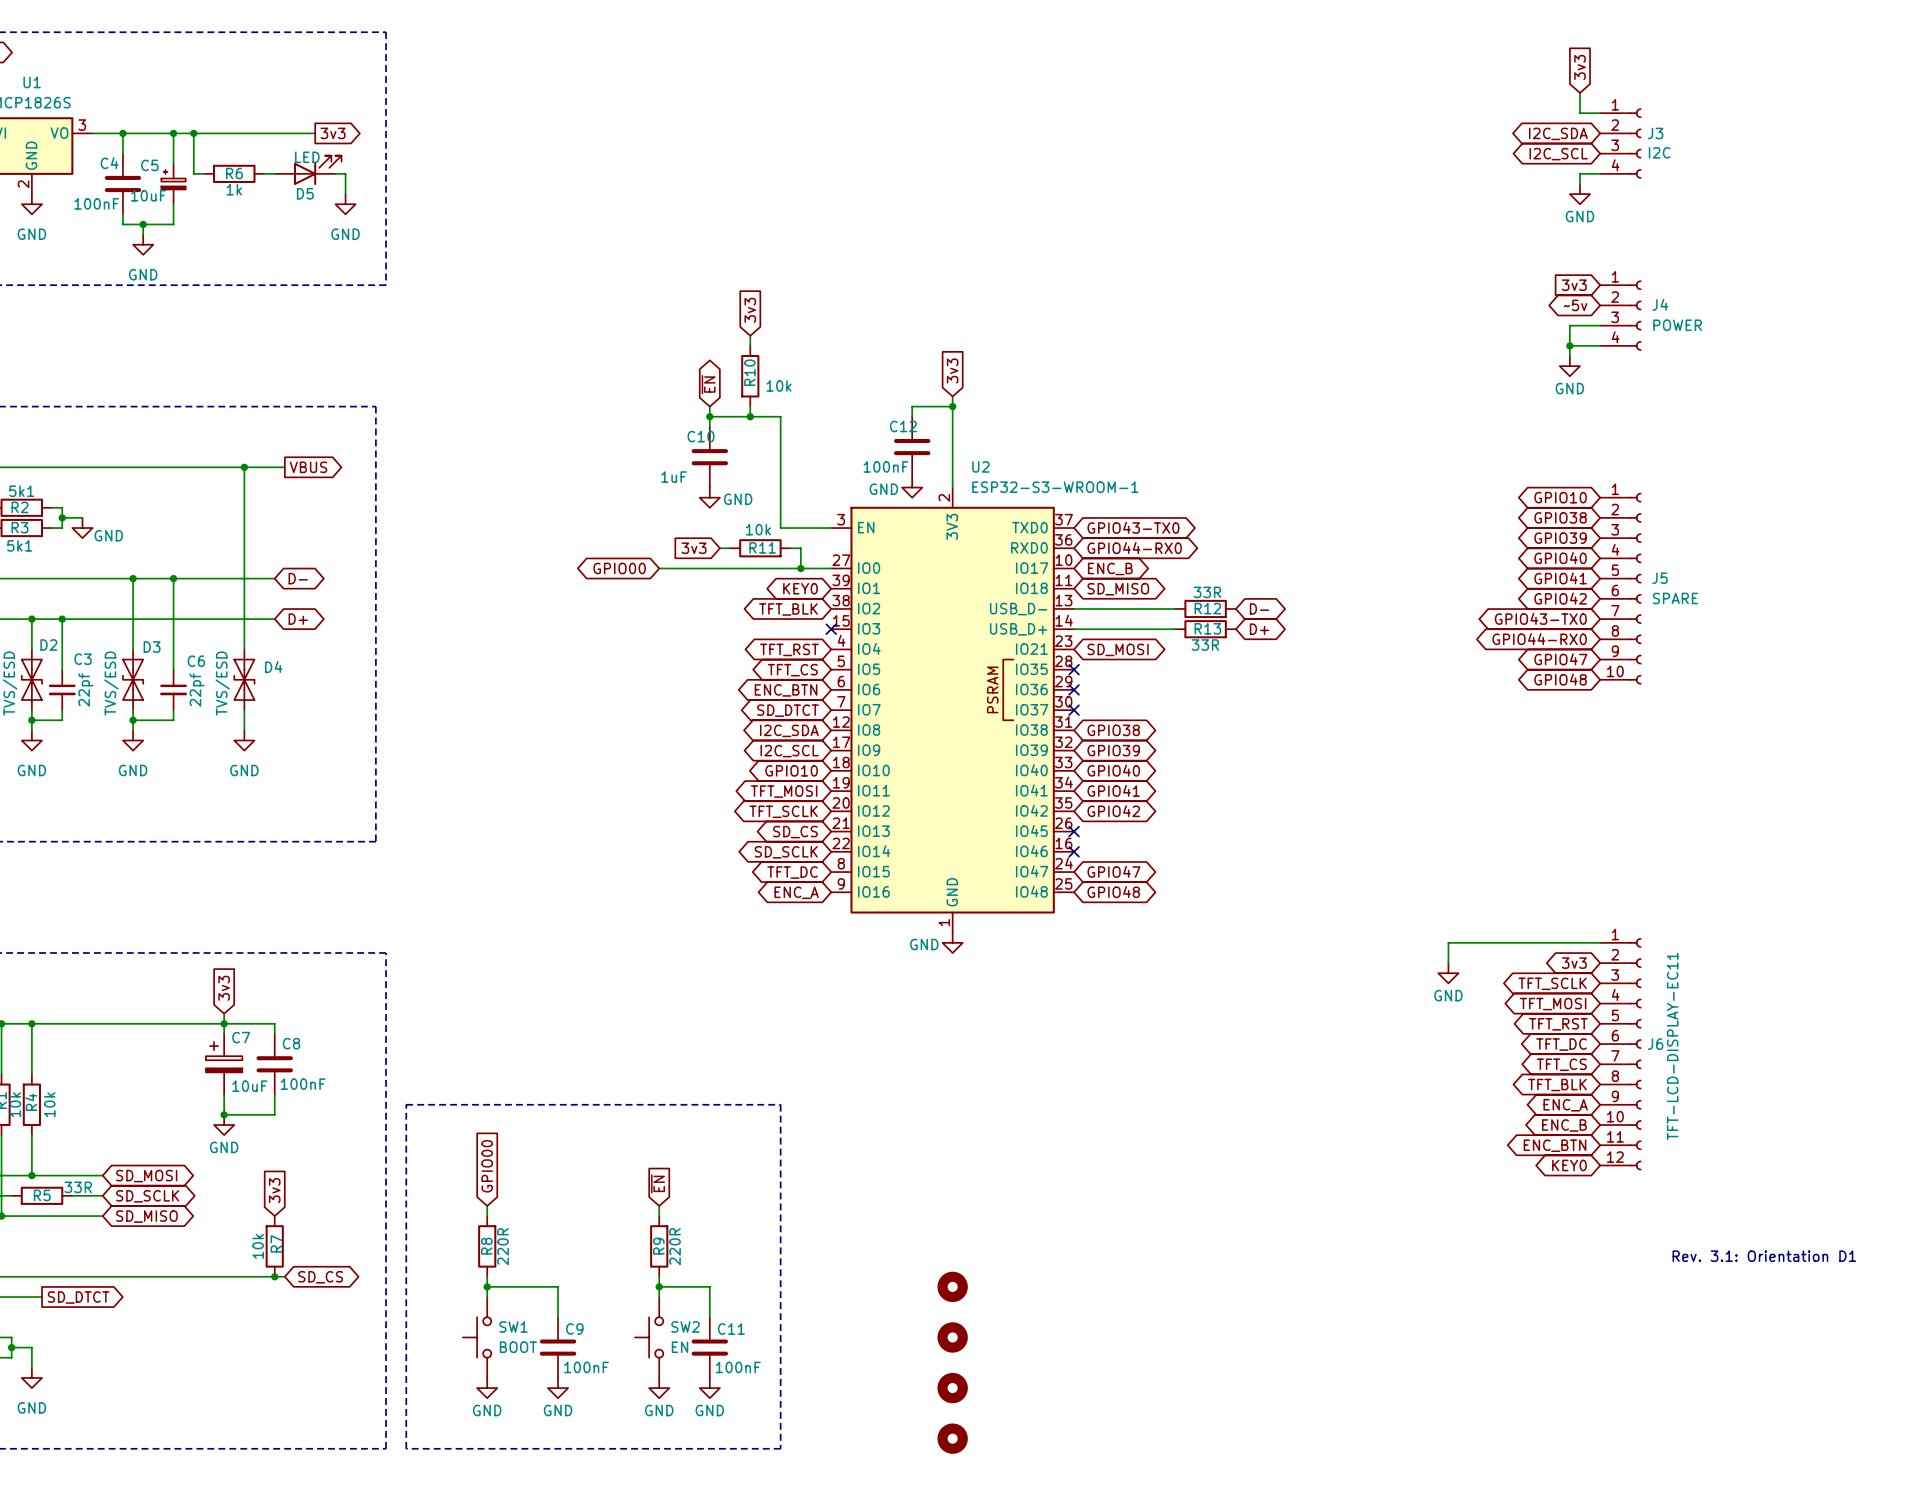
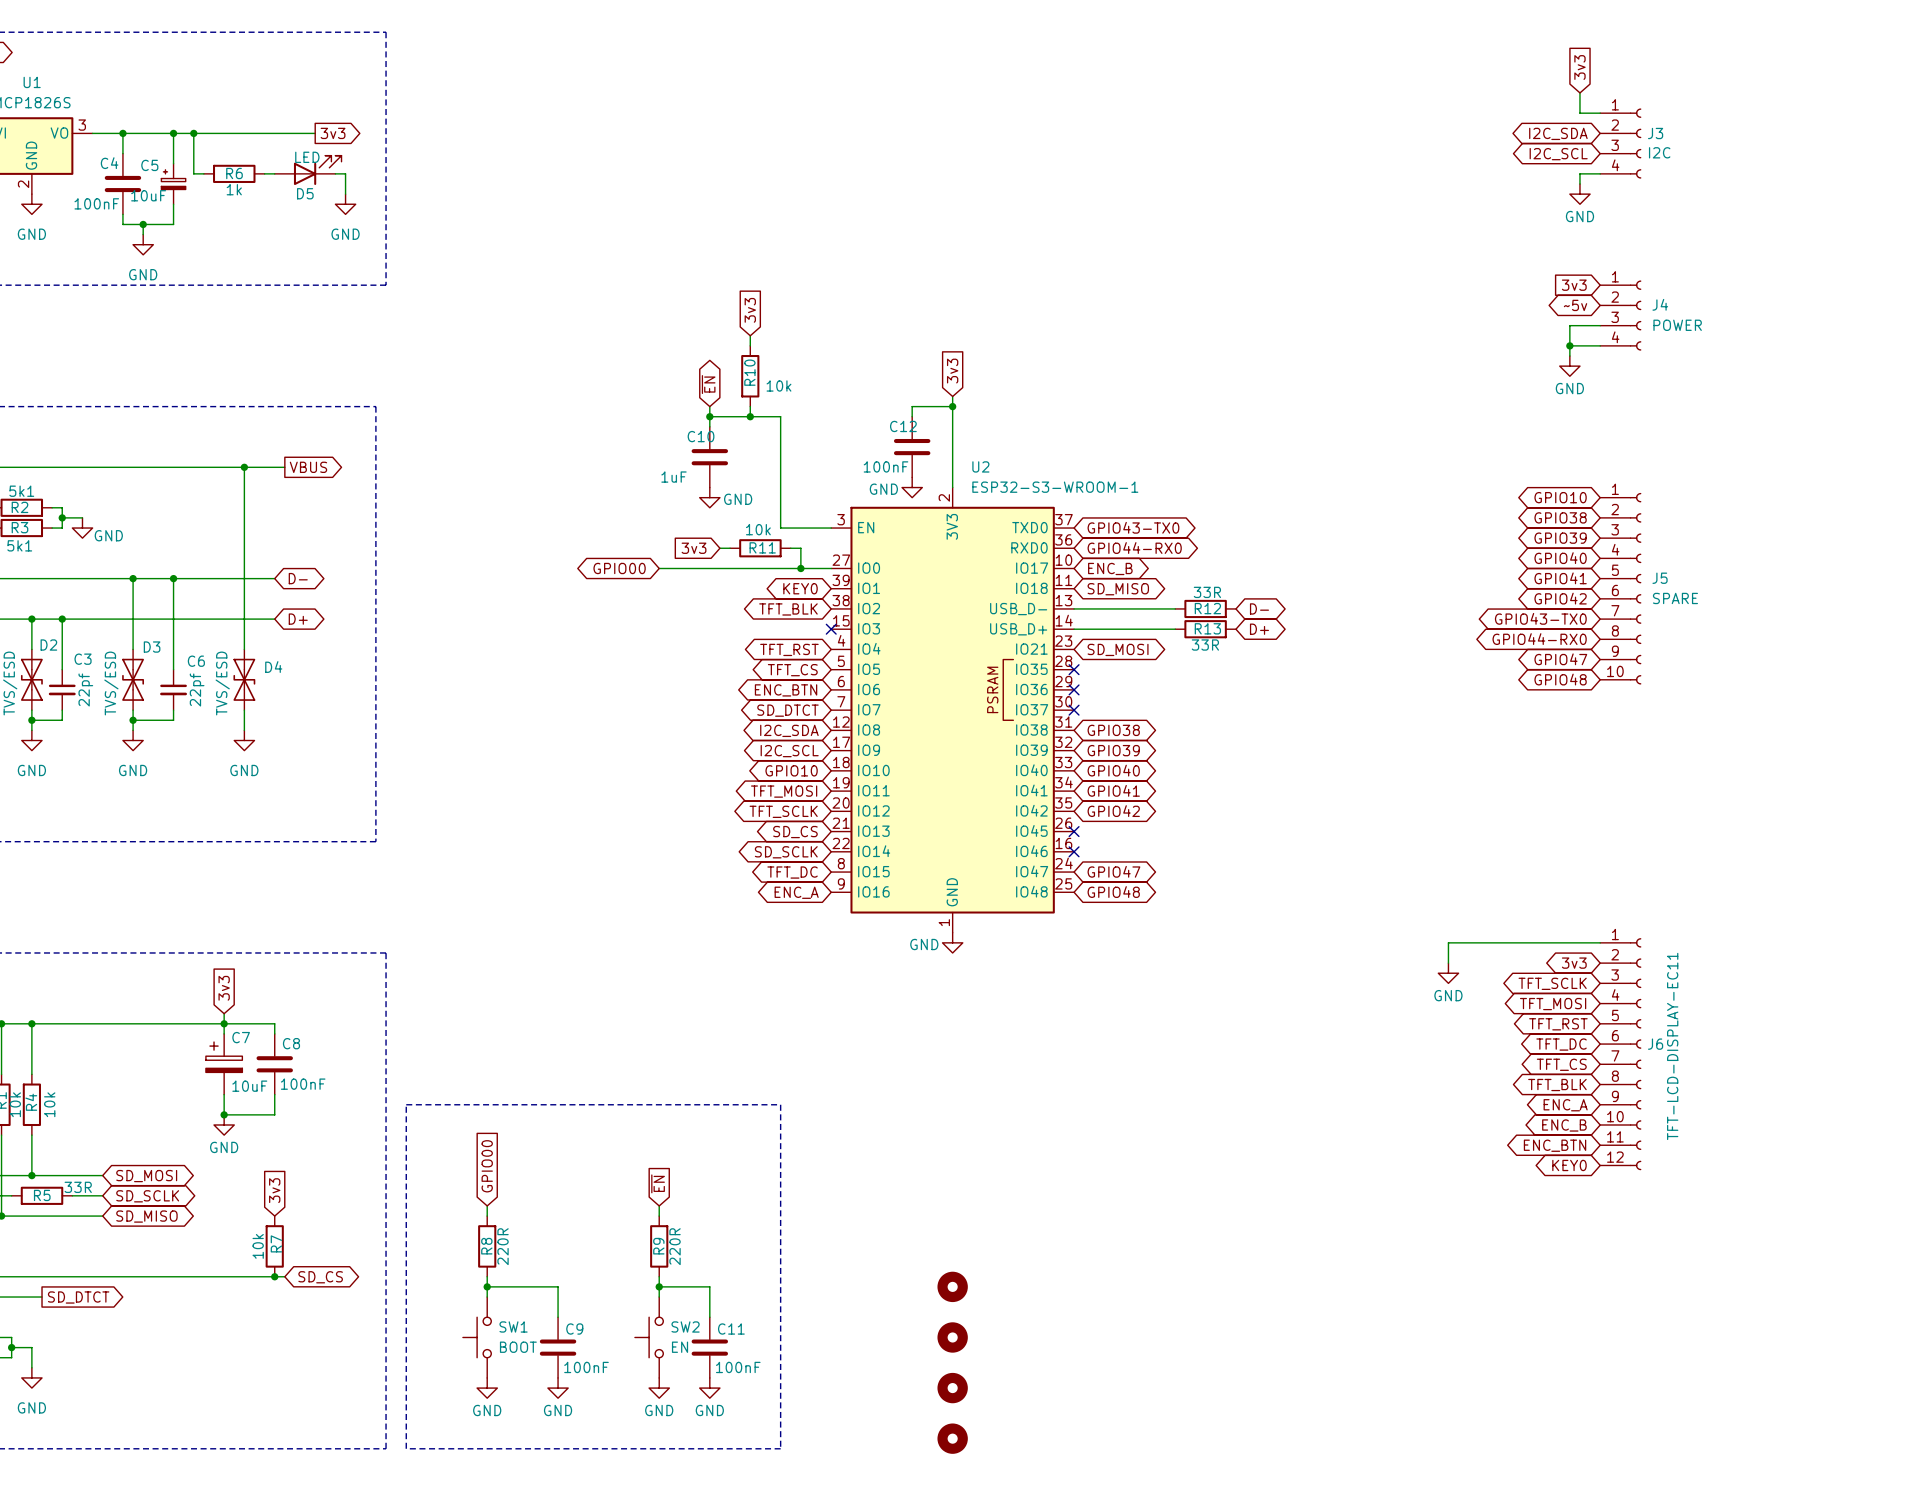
text: Rev. 3.1: Orientation D1 (1764, 1256) -> none

